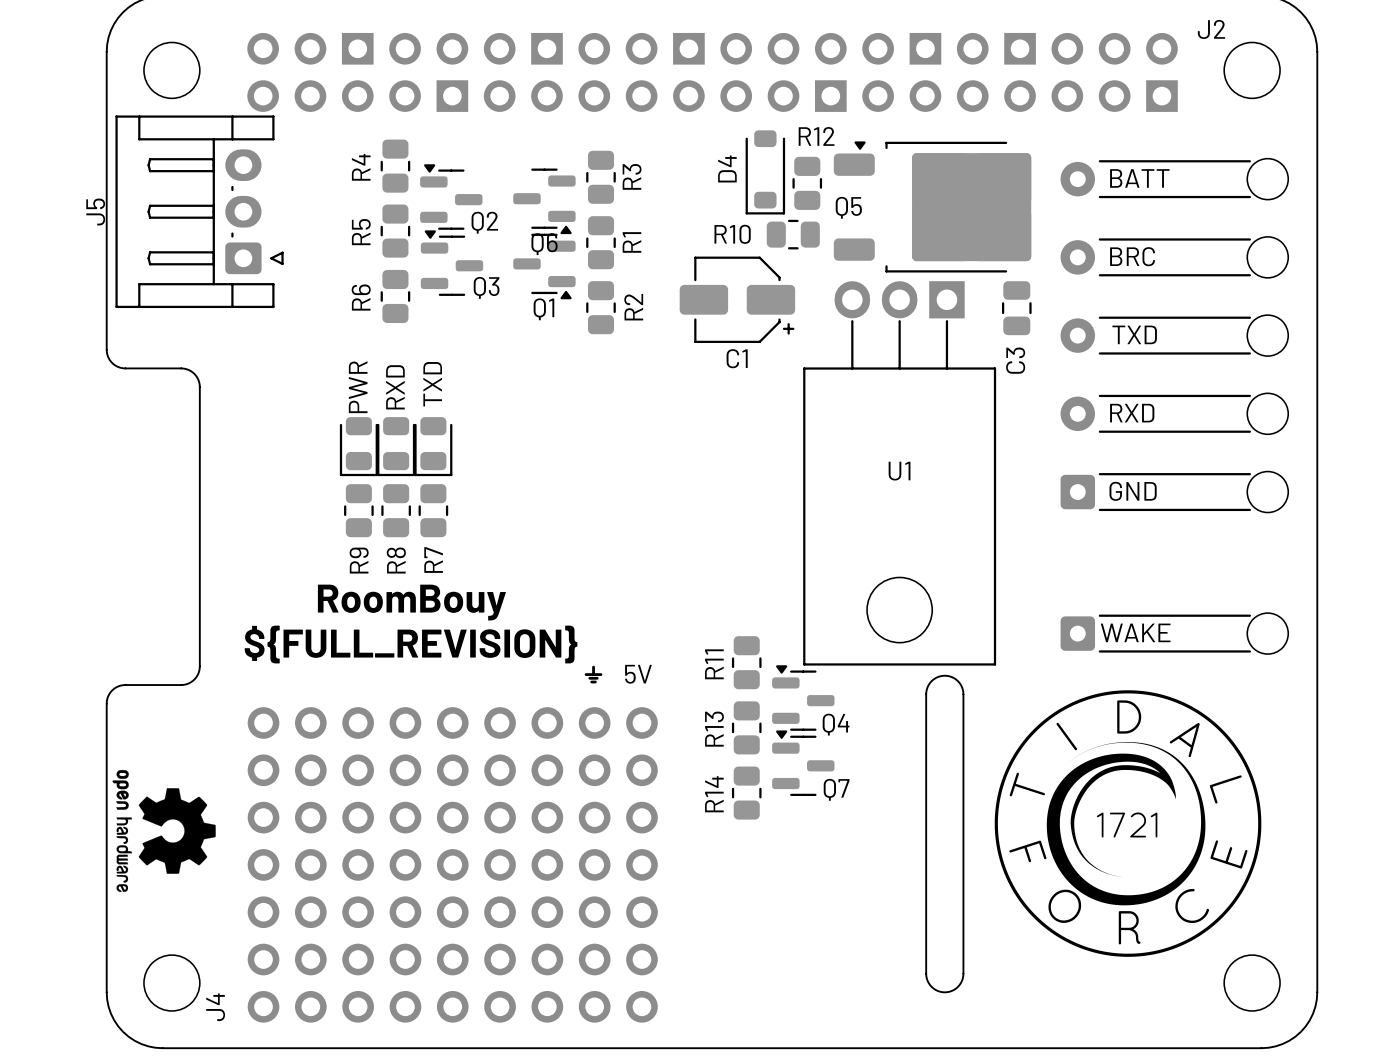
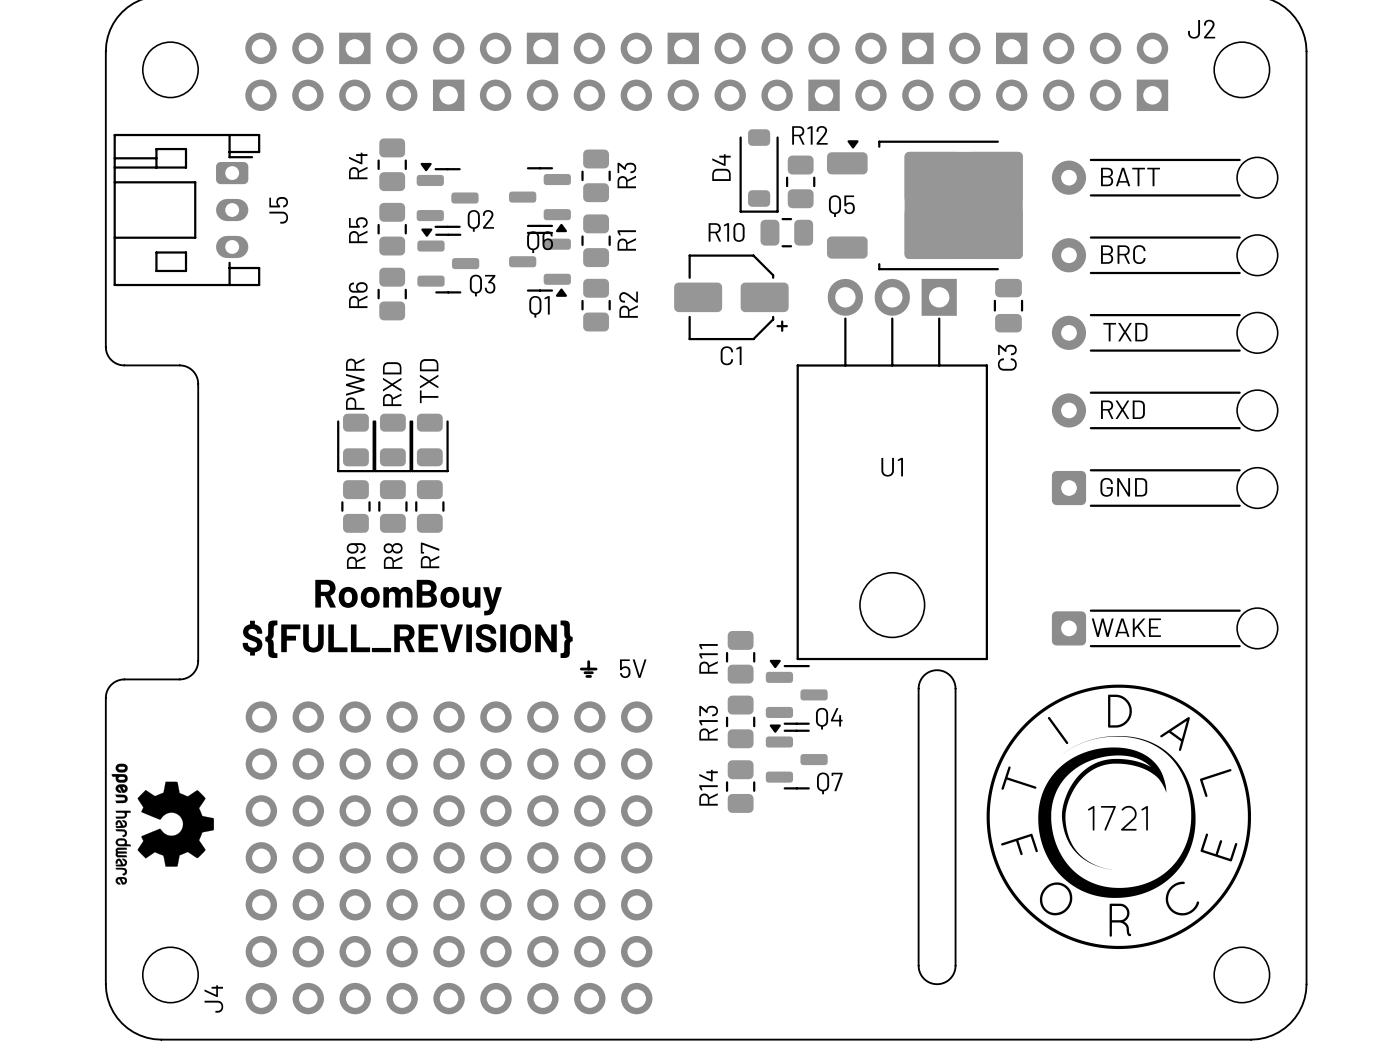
J5 footprint: [115, 115, 284, 309] -> [113, 133, 261, 287]
J5 name position: J5 (95, 212) -> J5 (278, 210)

